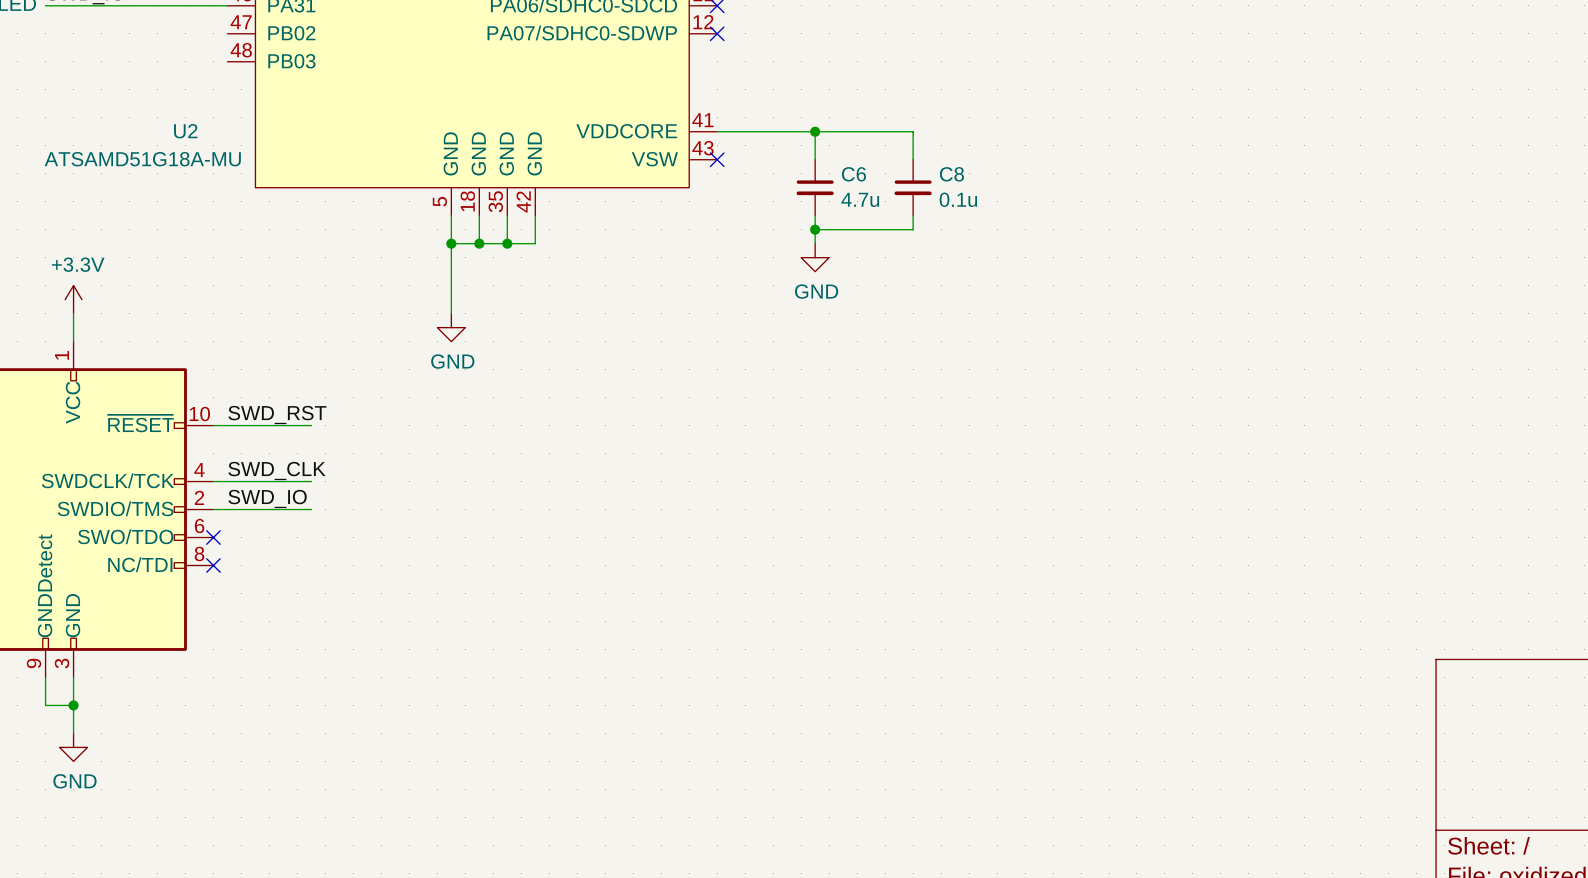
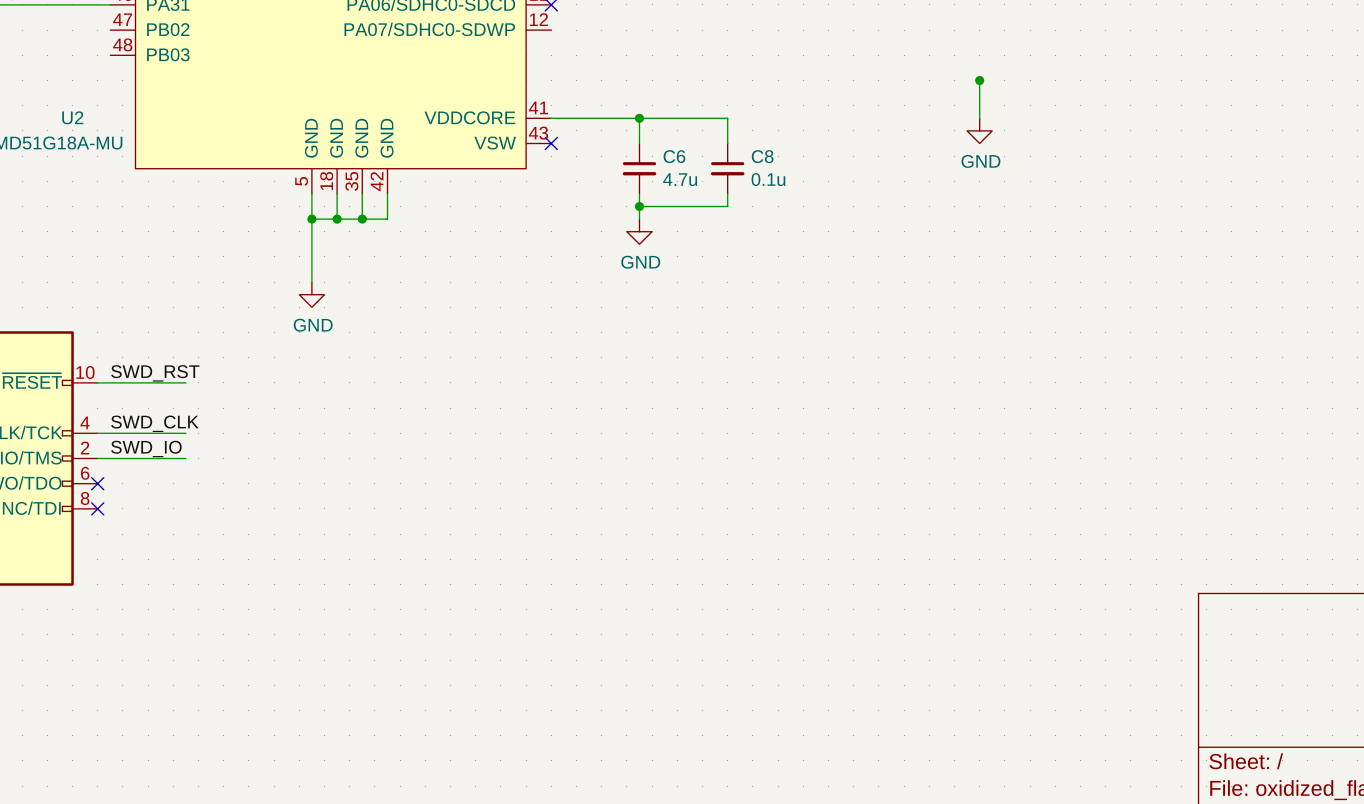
no-connect mark: (717, 33) -> none
wire: none -> (979, 80) (979, 118)
junction: none -> (979, 80)
power symbol: none -> GND (979, 130)

